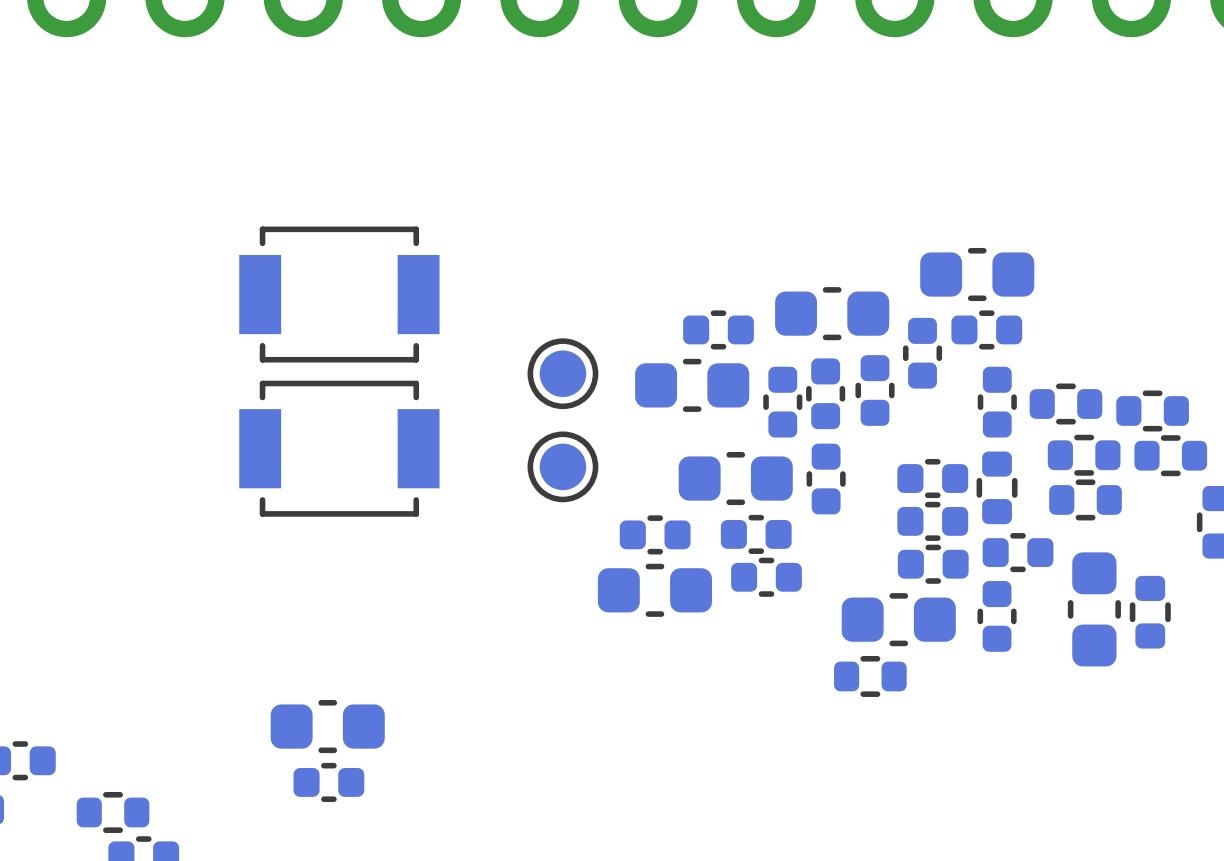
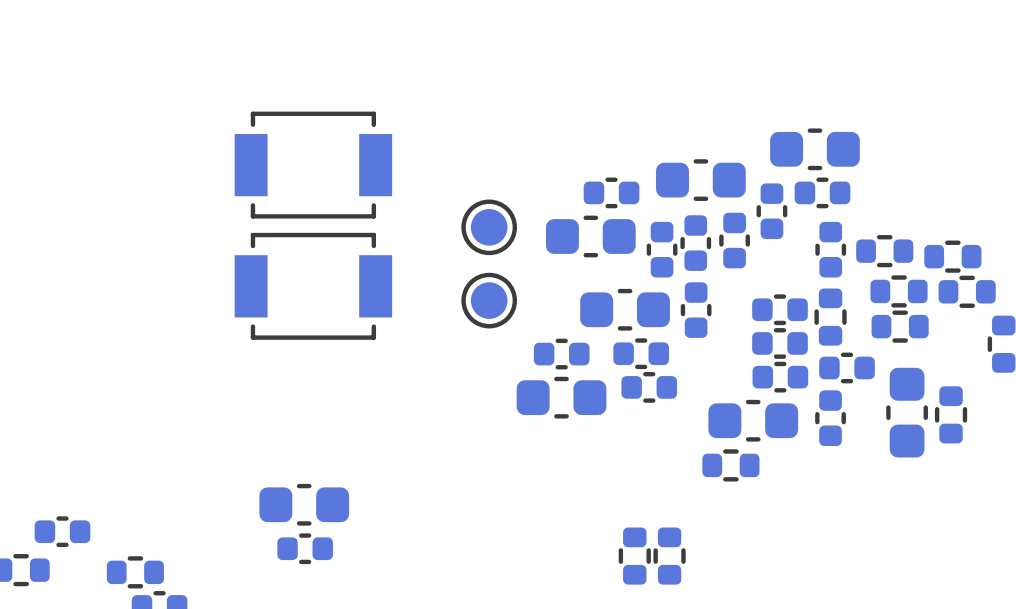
part: none -> (634, 556)
part: none -> (669, 556)

